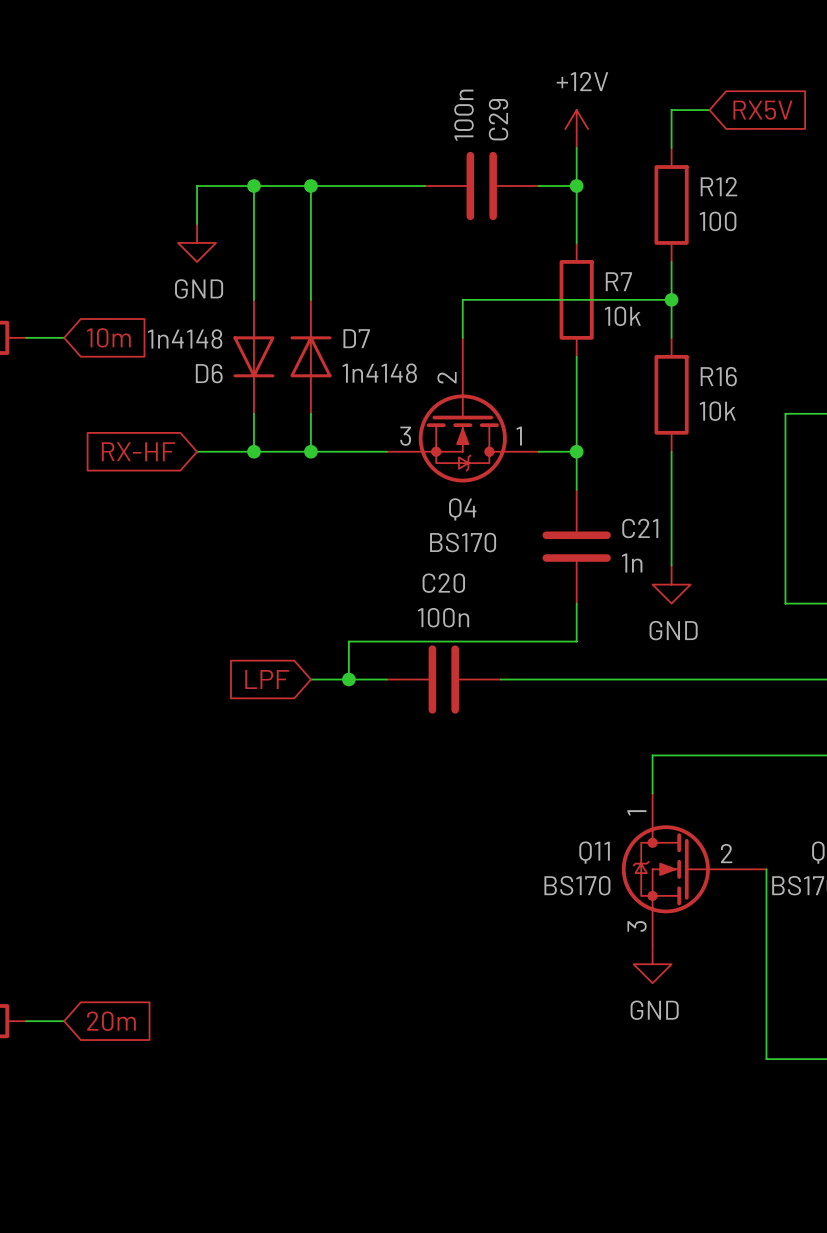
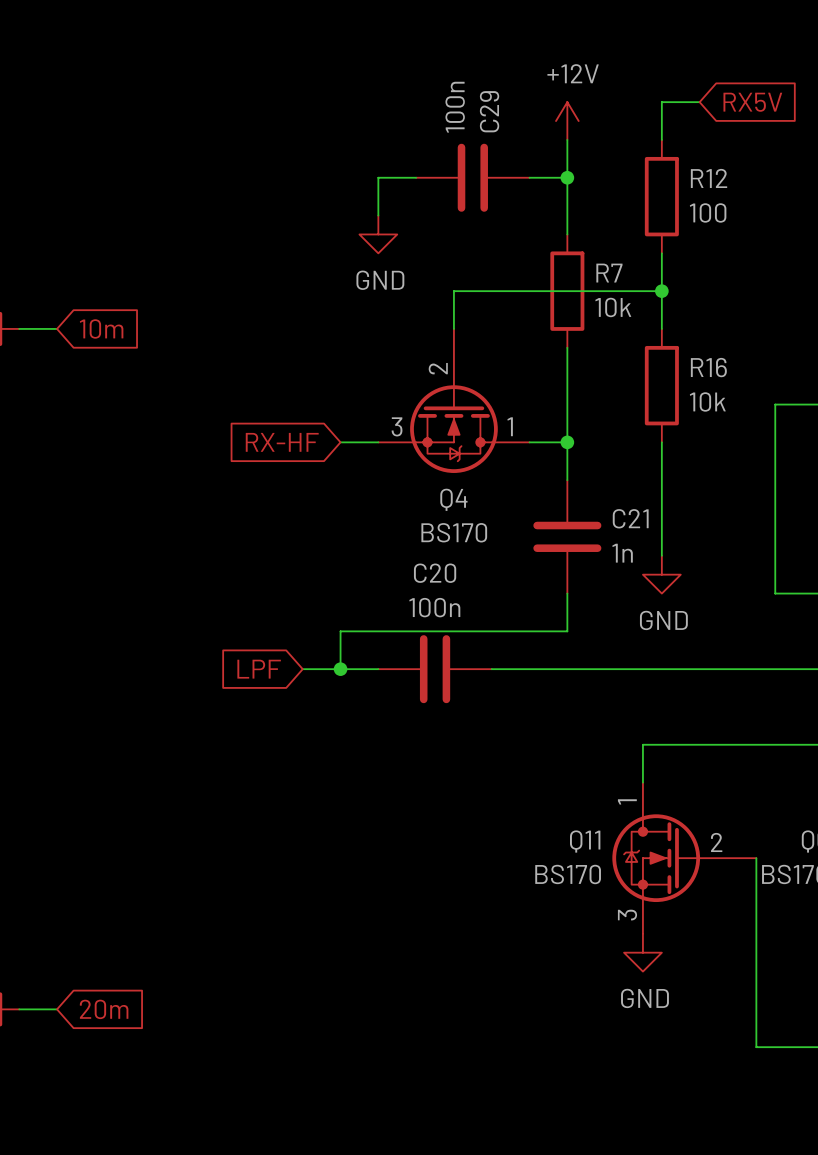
wire: (253, 186) (253, 299) -> none
junction: (253, 186) -> none
wire: (310, 186) (310, 299) -> none
junction: (310, 186) -> none
wire: (386, 186) (197, 186) (197, 223) -> (378, 177) (378, 215)
power symbol position: GND (197, 242) -> GND (378, 234)
D6: 1n4148 (253, 356) -> none
D7: 1n4148 (310, 356) -> none
wire: (253, 413) (253, 451) -> none
wire: (310, 413) (310, 451) -> none
global label position: RX-HF (138, 451) -> RX-HF (282, 442)
wire: (197, 451) (348, 451) -> none
junction: (253, 451) -> none
junction: (310, 451) -> none

